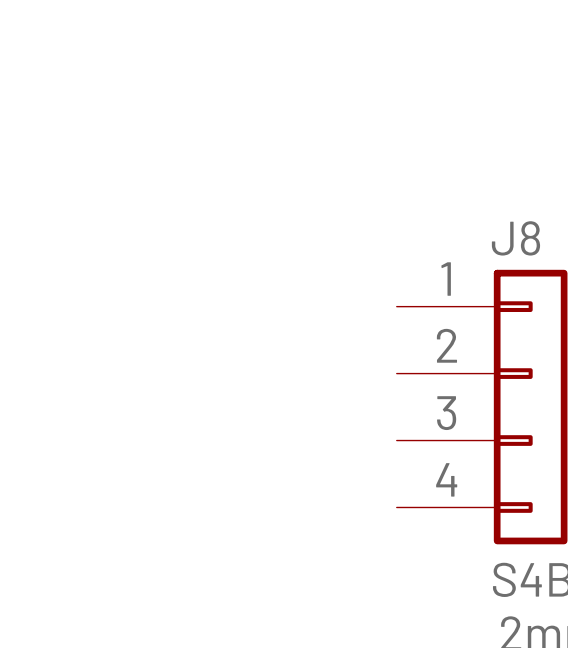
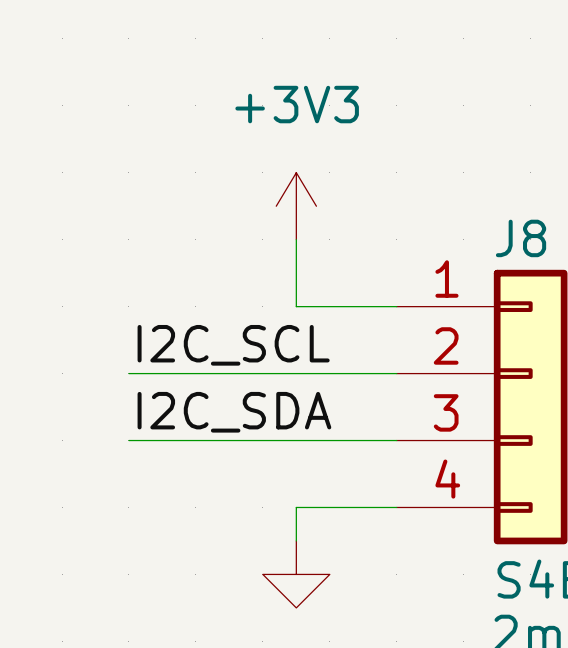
power symbol: none -> +3V3 (296, 206)
wire: none -> (296, 239) (296, 306) (396, 306)
label: none -> I2C_SCL (233, 345)
wire: none -> (128, 373) (396, 373)
label: none -> I2C_SDA (234, 412)
wire: none -> (128, 440) (396, 440)
wire: none -> (396, 507) (296, 507) (296, 540)
power symbol: none -> (296, 574)

